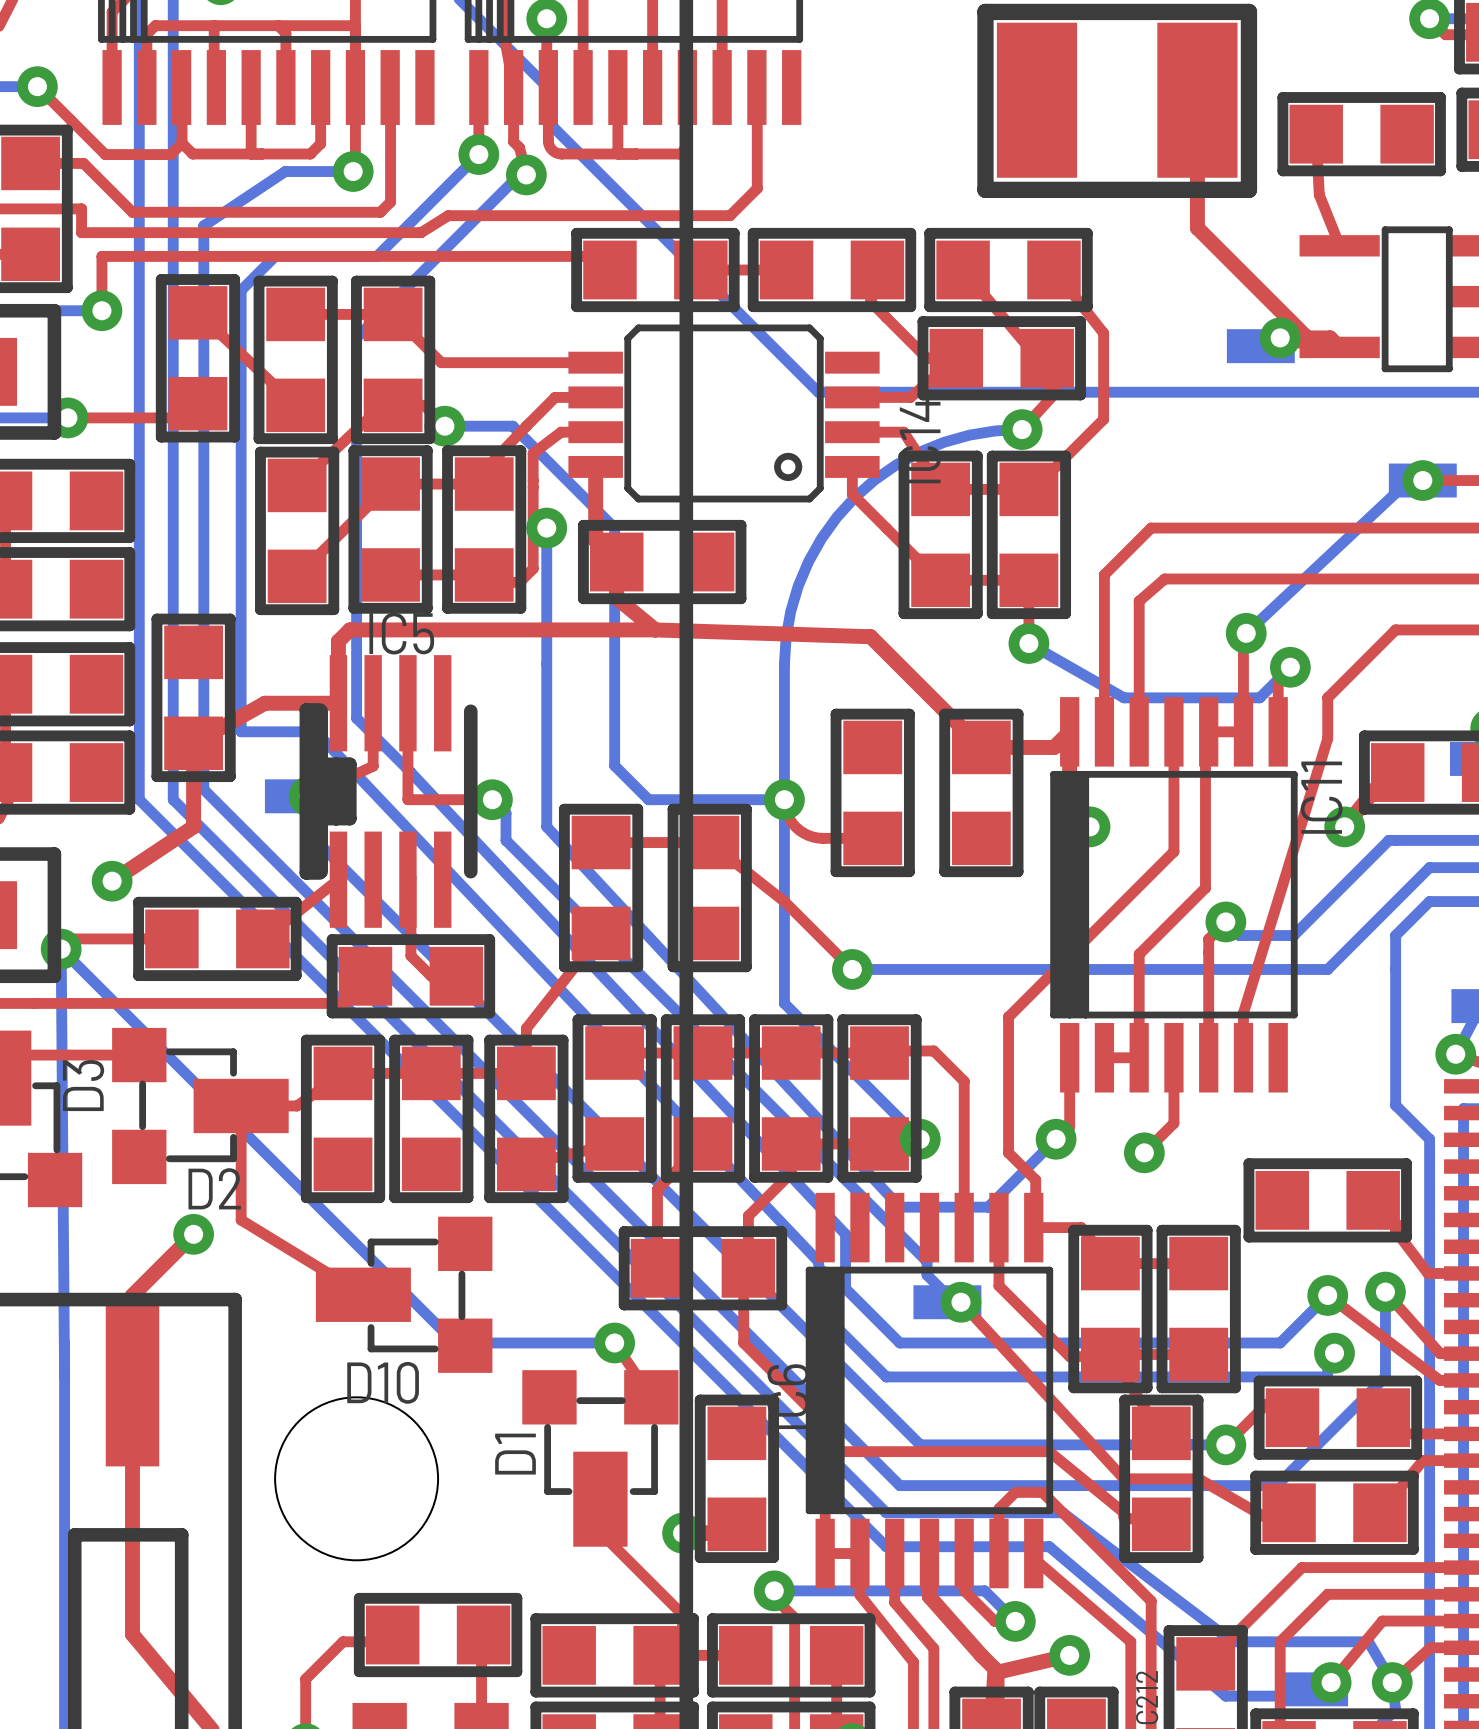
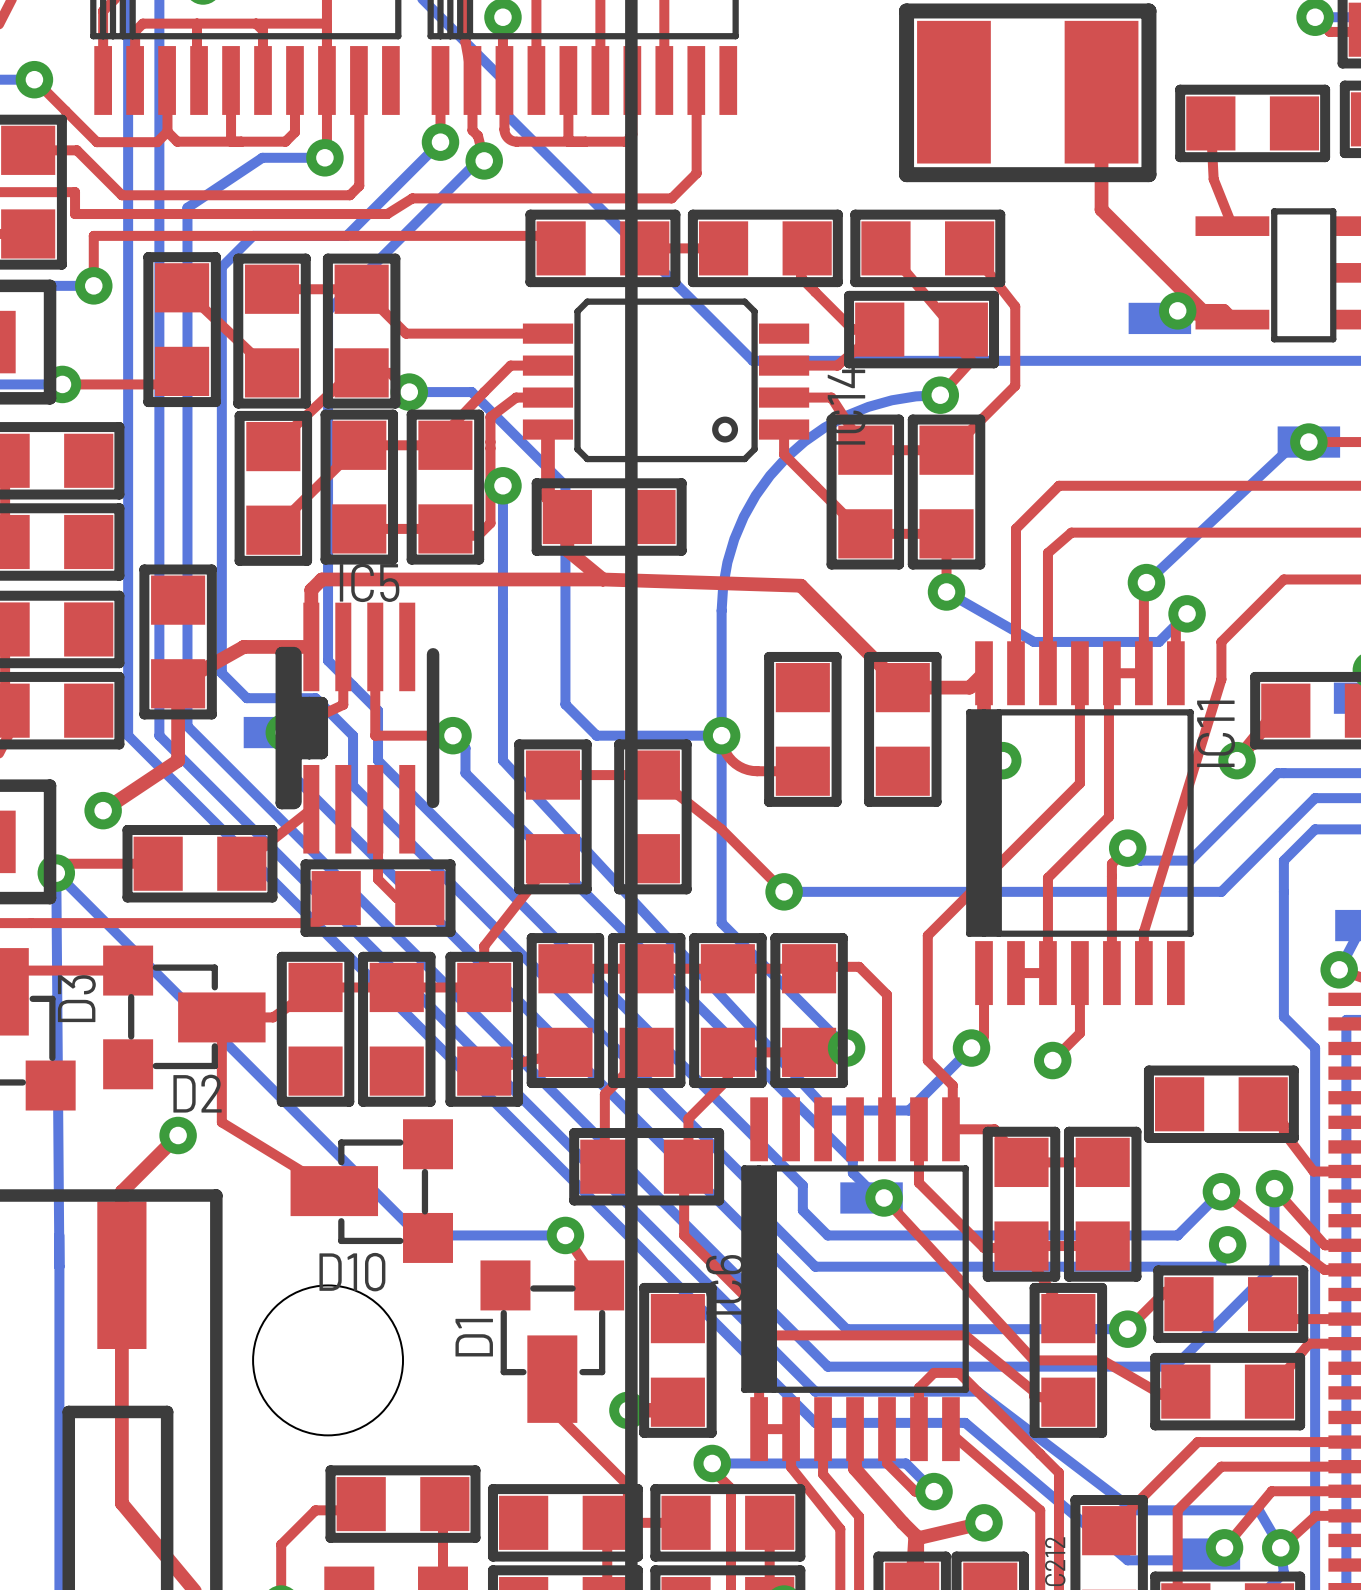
bottom track: (241, 731) (315, 731) (818, 1261) (825, 1315) -> (221, 673) (246, 698) (315, 698) (353, 735) (353, 785) (759, 1191) (759, 1210)
bottom track: (410, 772) (845, 1234) (845, 1288) (872, 1315) -> (378, 710) (378, 760) (802, 1185) (802, 1210)

